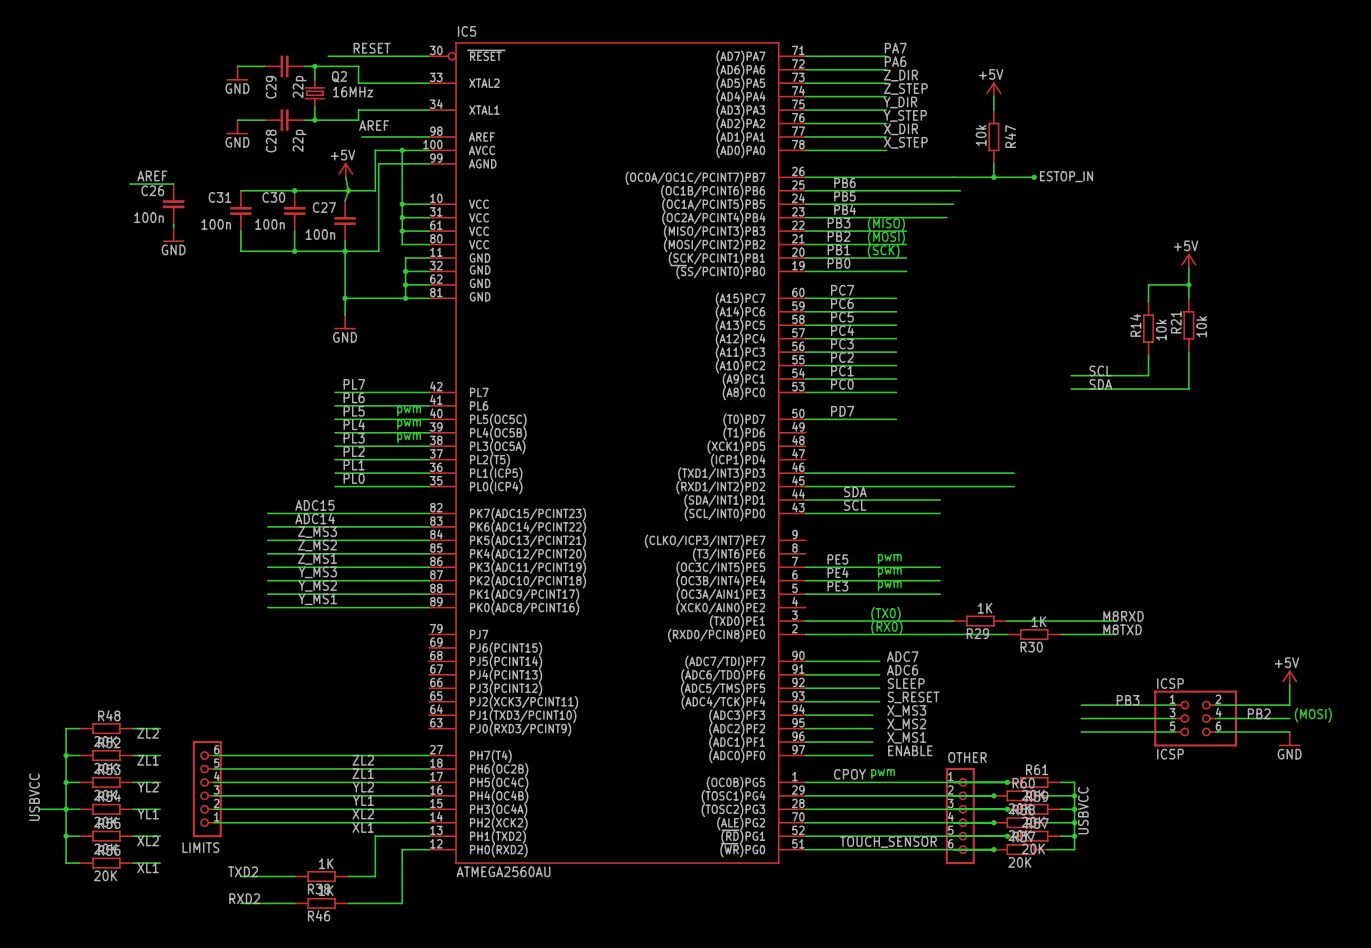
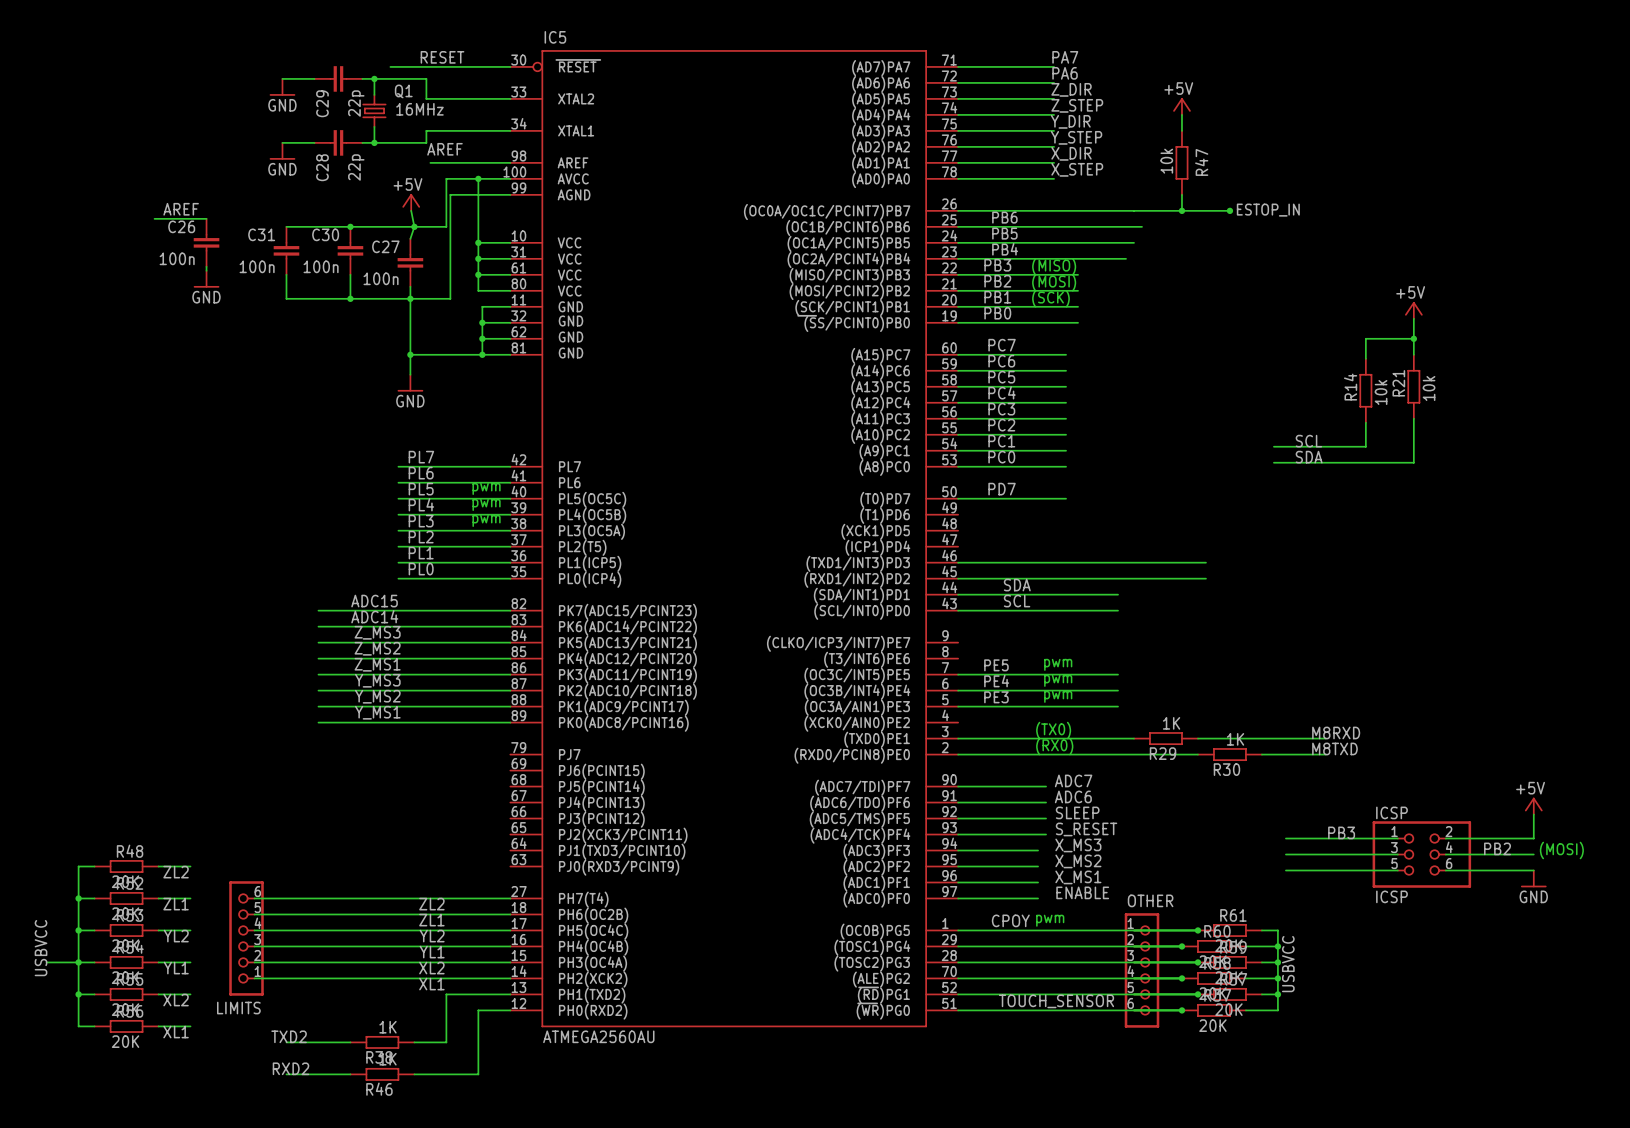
Q2 name: Q2 (339, 76) -> Q1 (403, 91)

